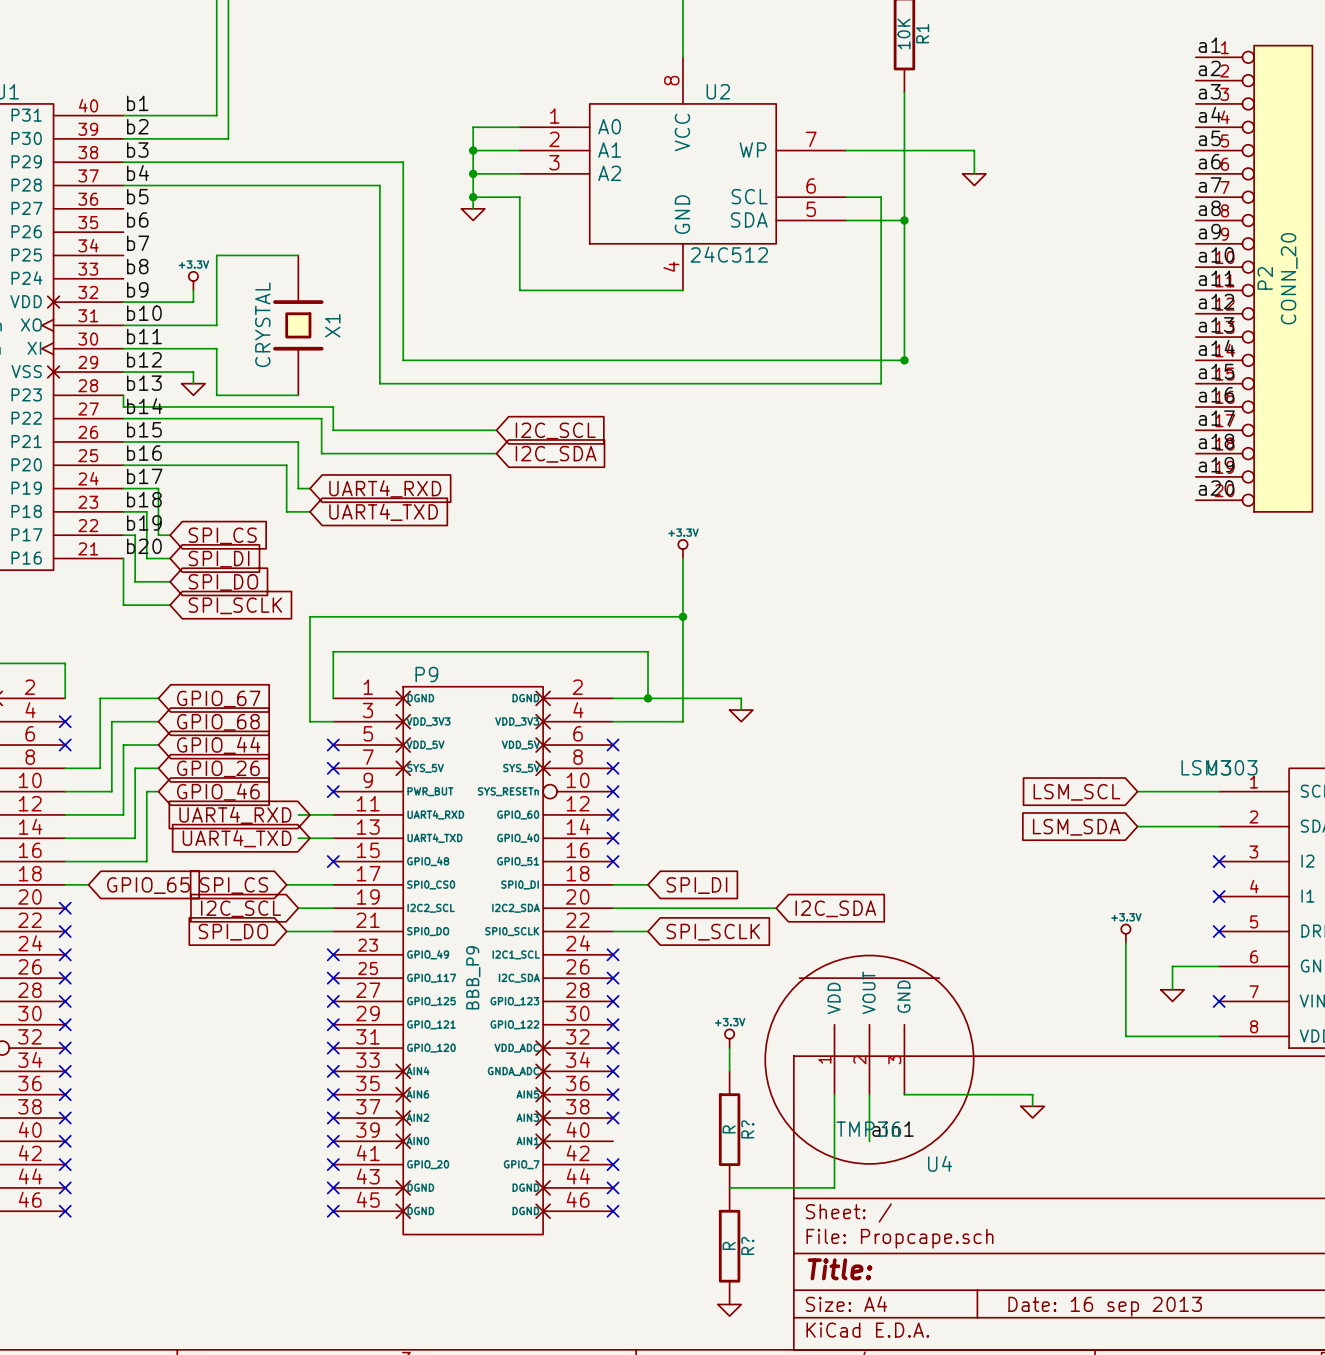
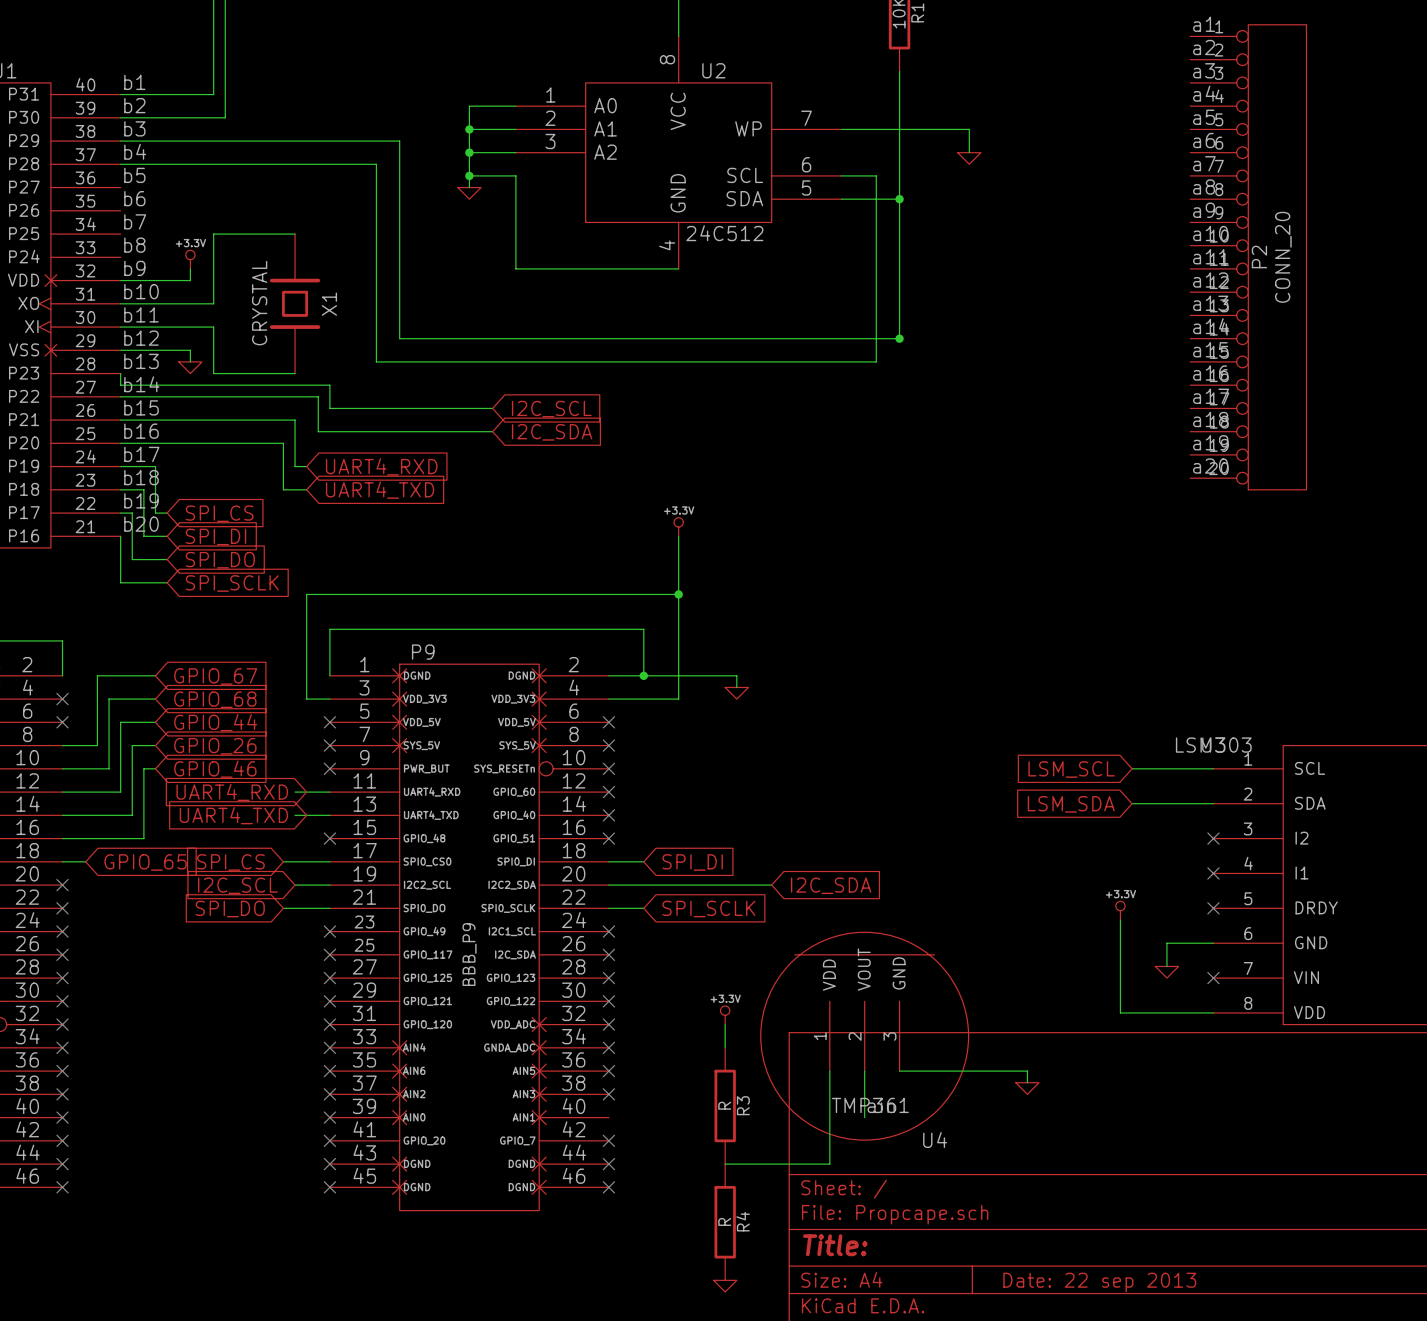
R? name: R? (747, 1129) -> R3 (743, 1105)
R? name: R? (747, 1245) -> R4 (743, 1221)
title block: Date: 16 sep 2013 (1105, 1306) -> Date: 22 sep 2013 (1099, 1282)

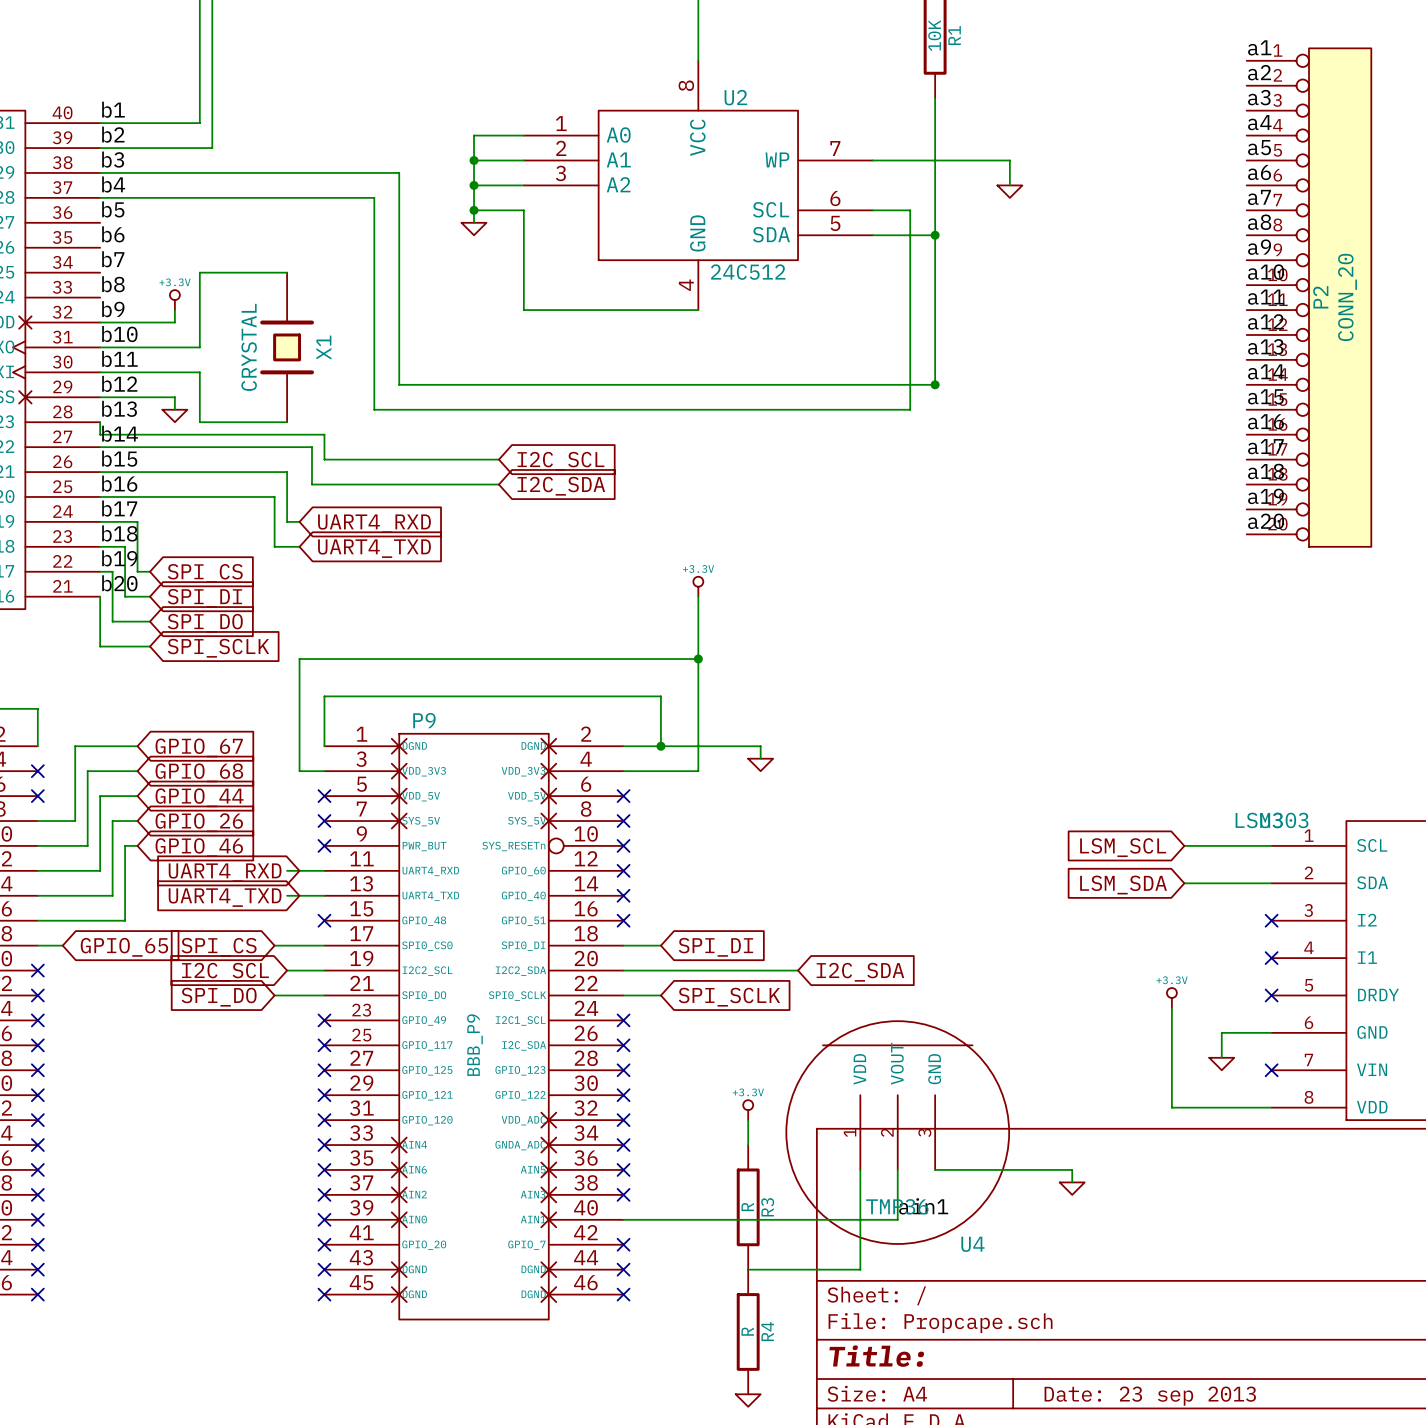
wire: none -> (623, 1219) (897, 1219)
title block: Date: 22 sep 2013 (1099, 1282) -> Date: 23 sep 2013 (1150, 1396)

